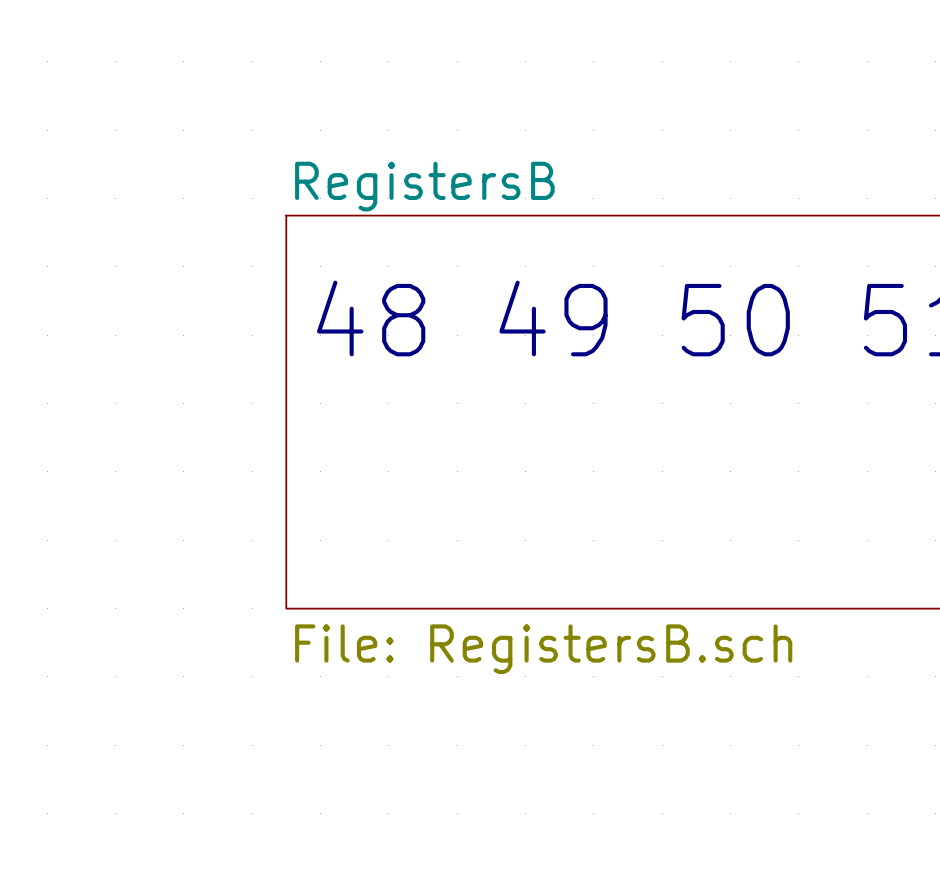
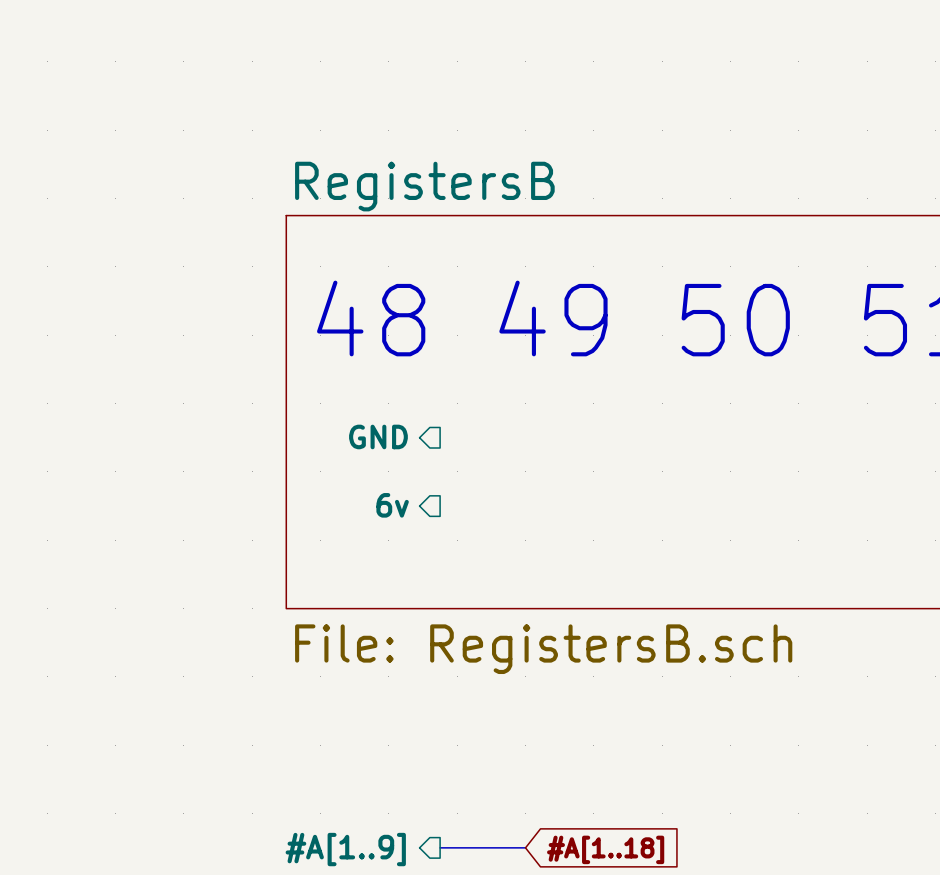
sheet pin: none -> GND (378, 436)
sheet pin: none -> 6v (392, 505)
bus: none -> (440, 847) (525, 847)
sheet pin: none -> #A[1..9] (345, 849)
global label: none -> #A[1..18] (605, 849)

